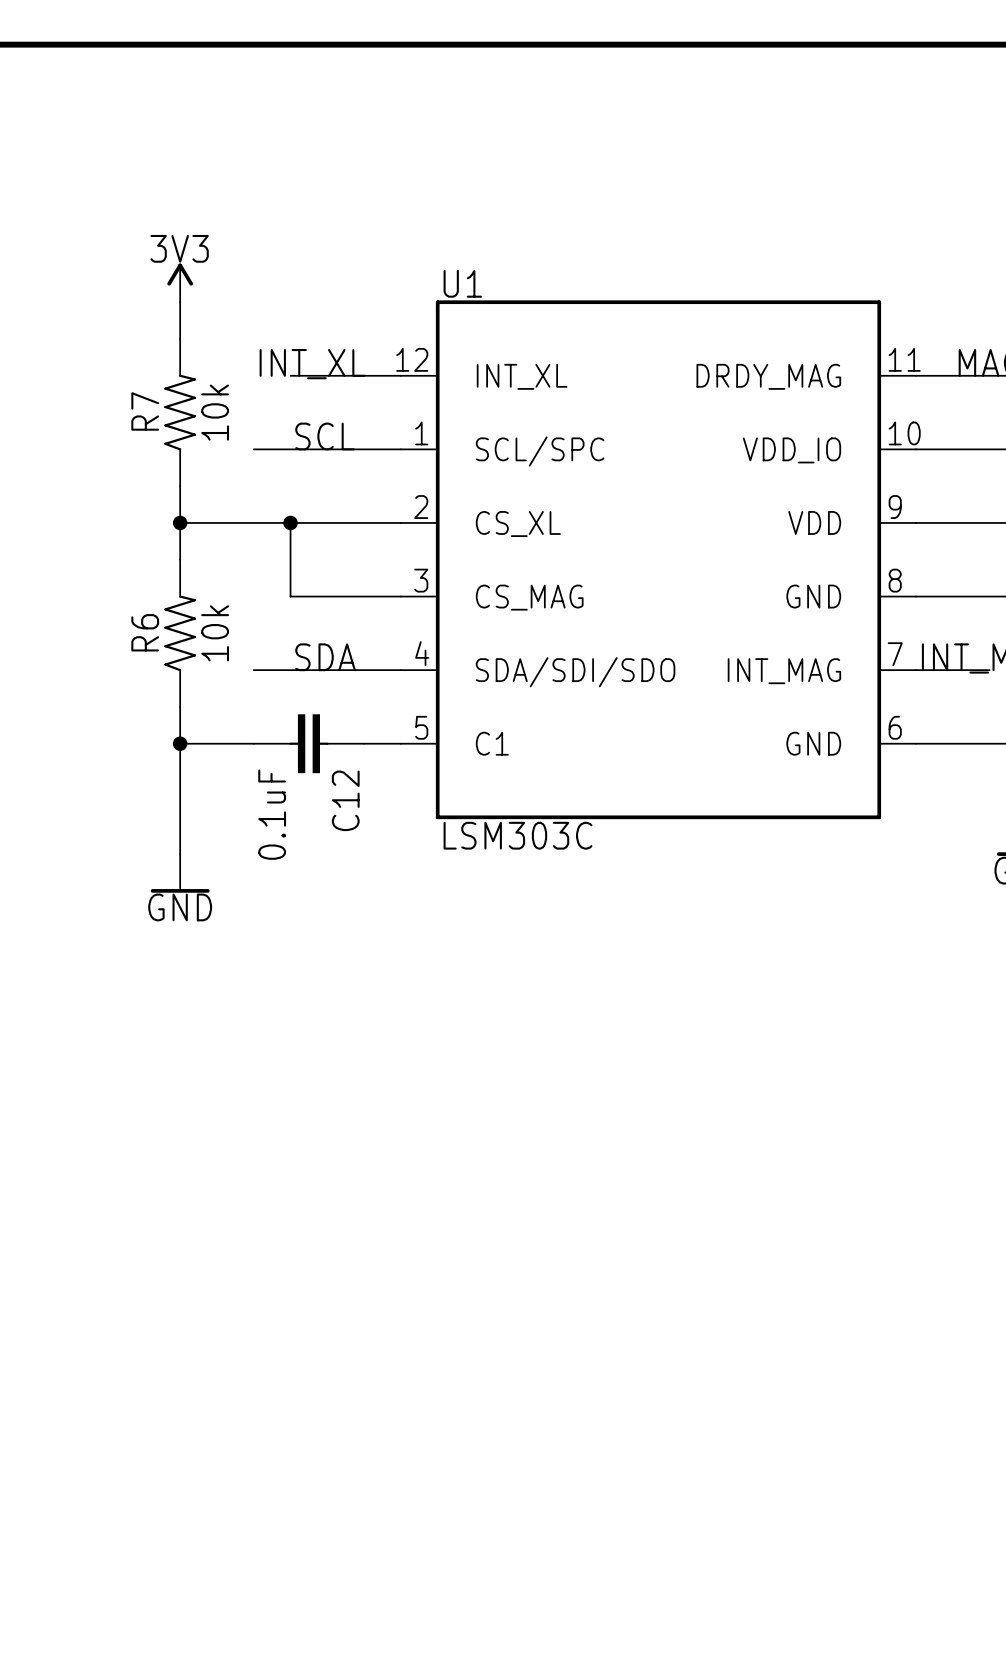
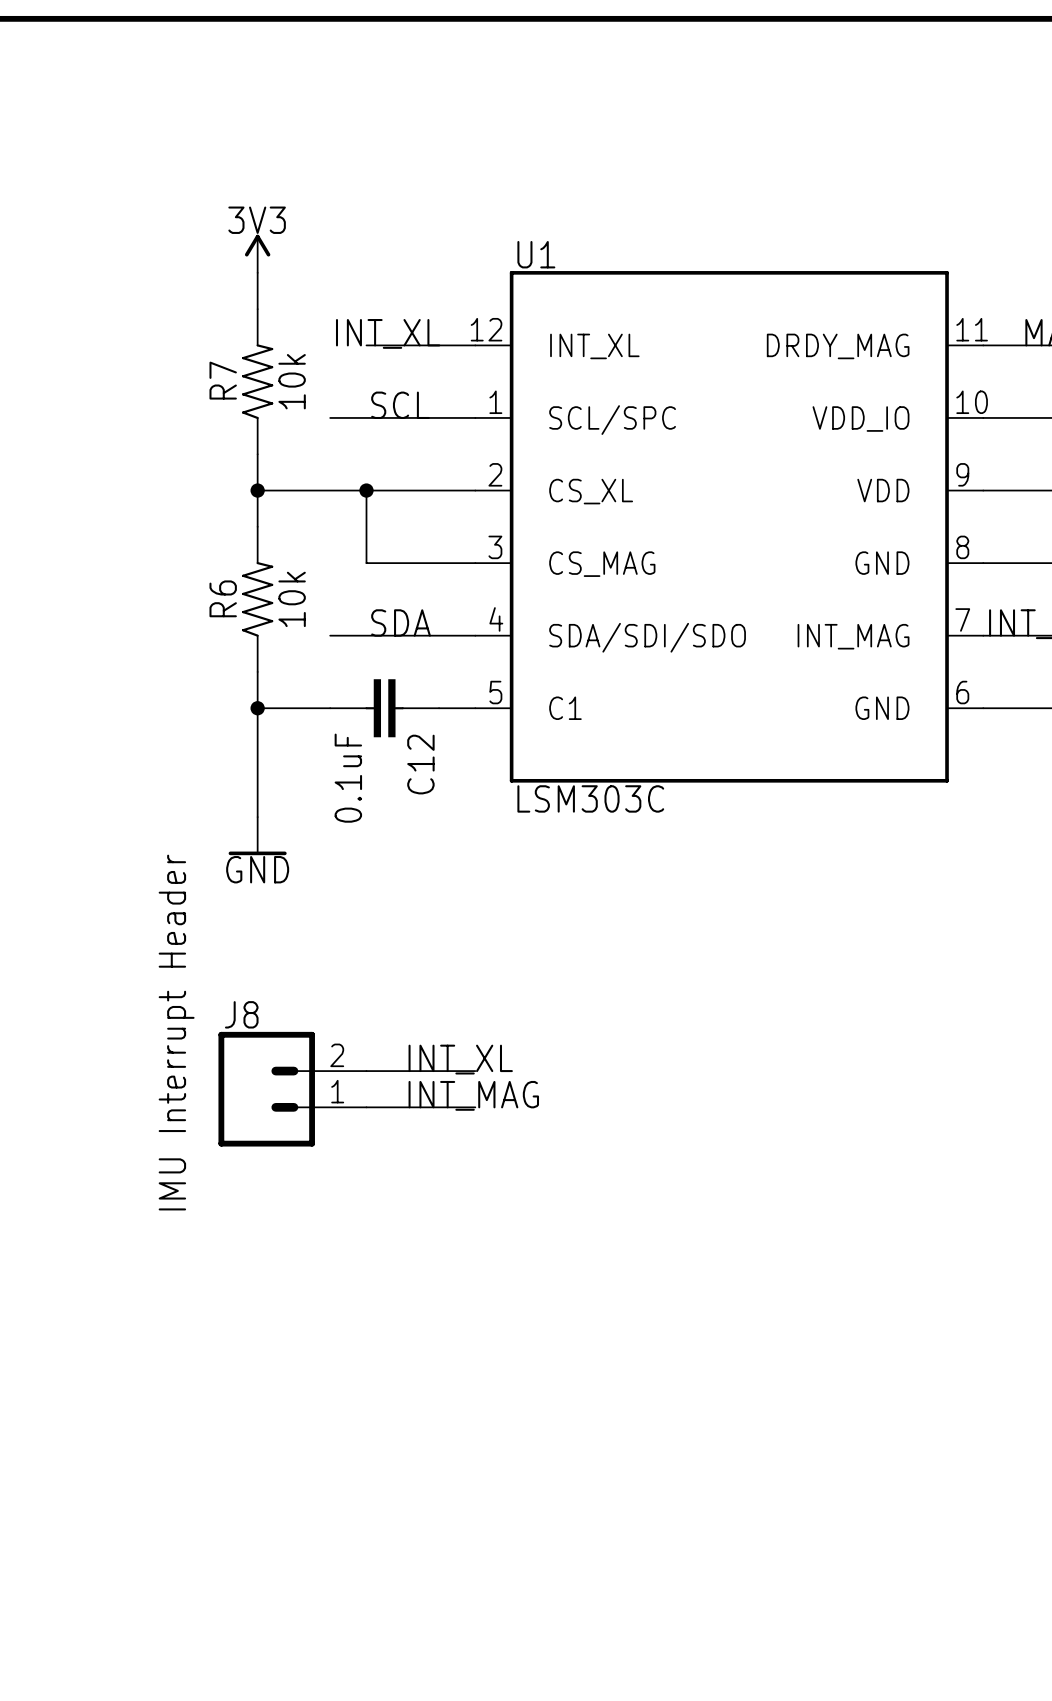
label: none -> INT_XL (460, 1059)
wire: none -> (366, 1071) (475, 1071)
J8: none -> (292, 1089)
label: none -> INT_MAG (473, 1095)
wire: none -> (366, 1107) (475, 1107)

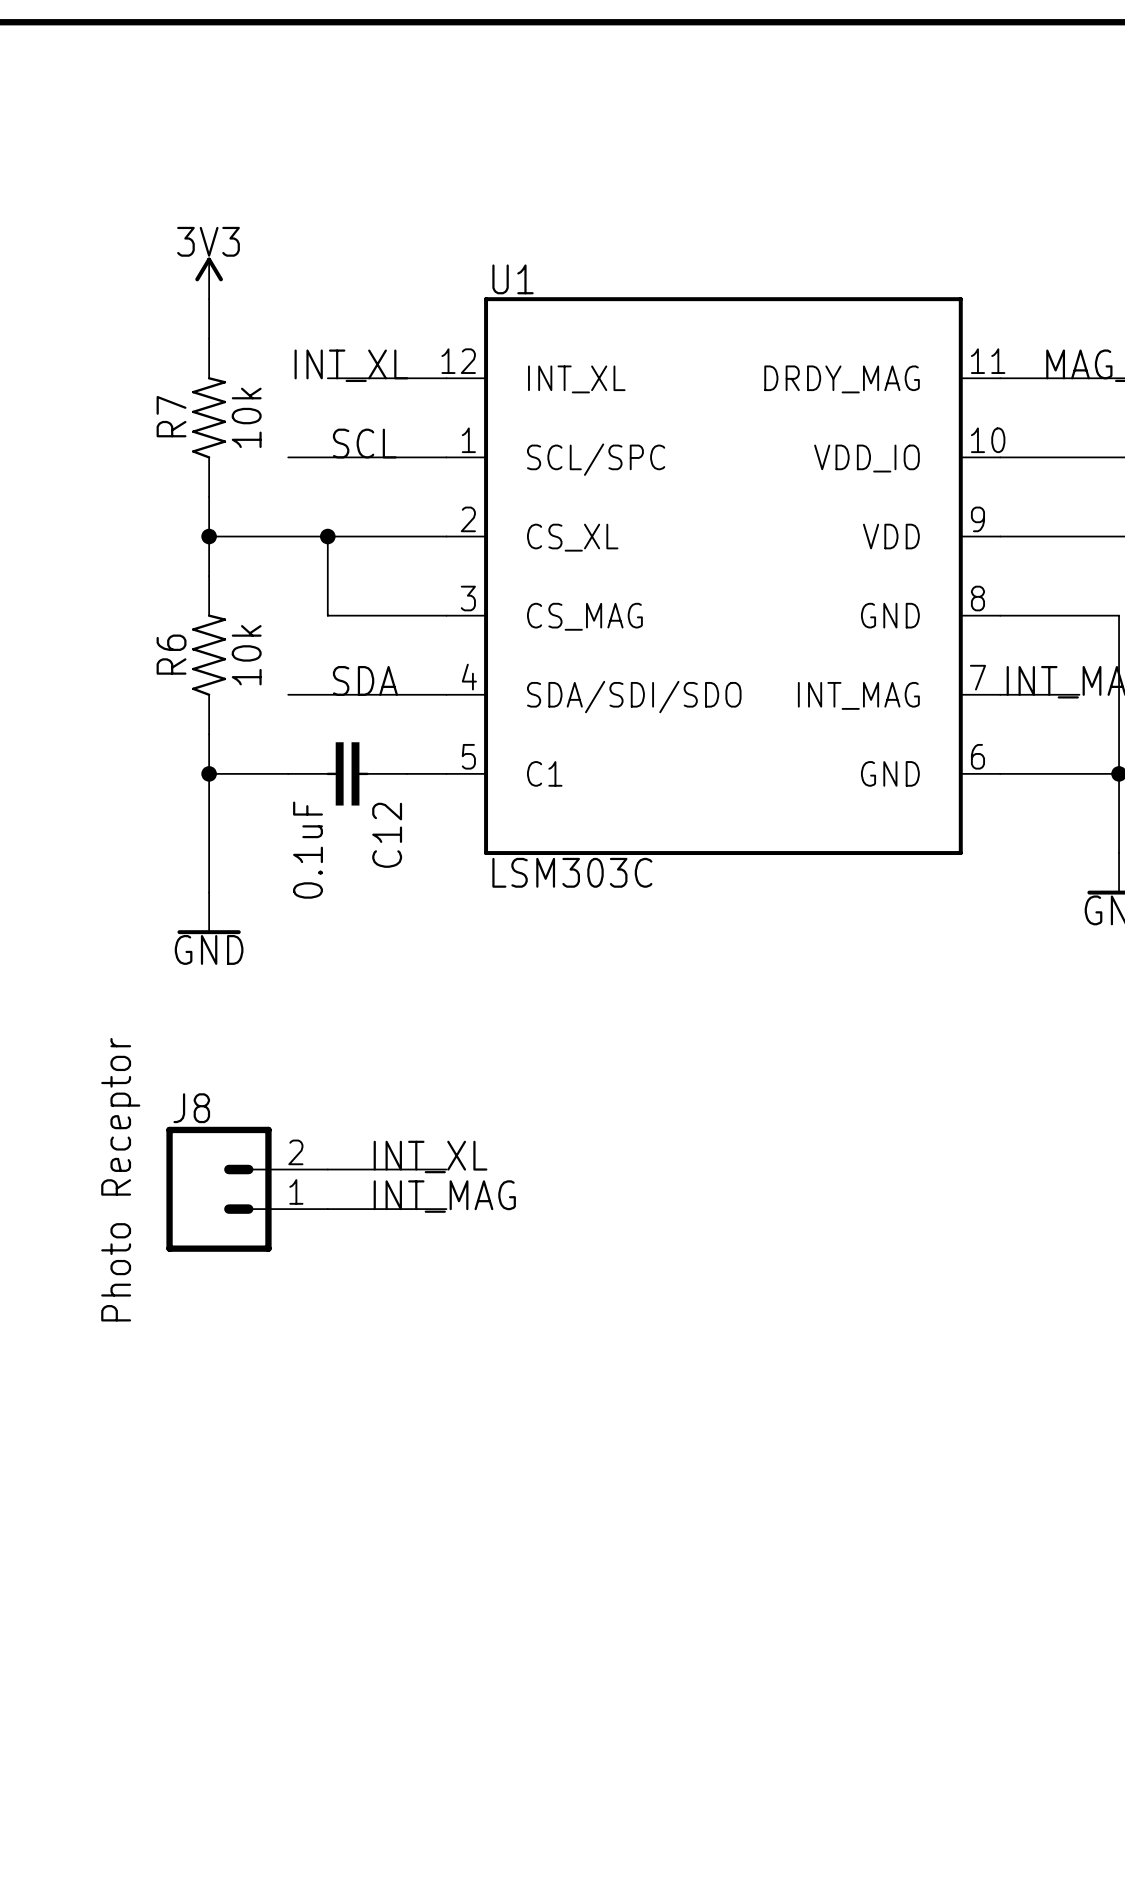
J8 text: IMU Interrupt Header (176, 1032) -> Photo Receptor (120, 1179)

